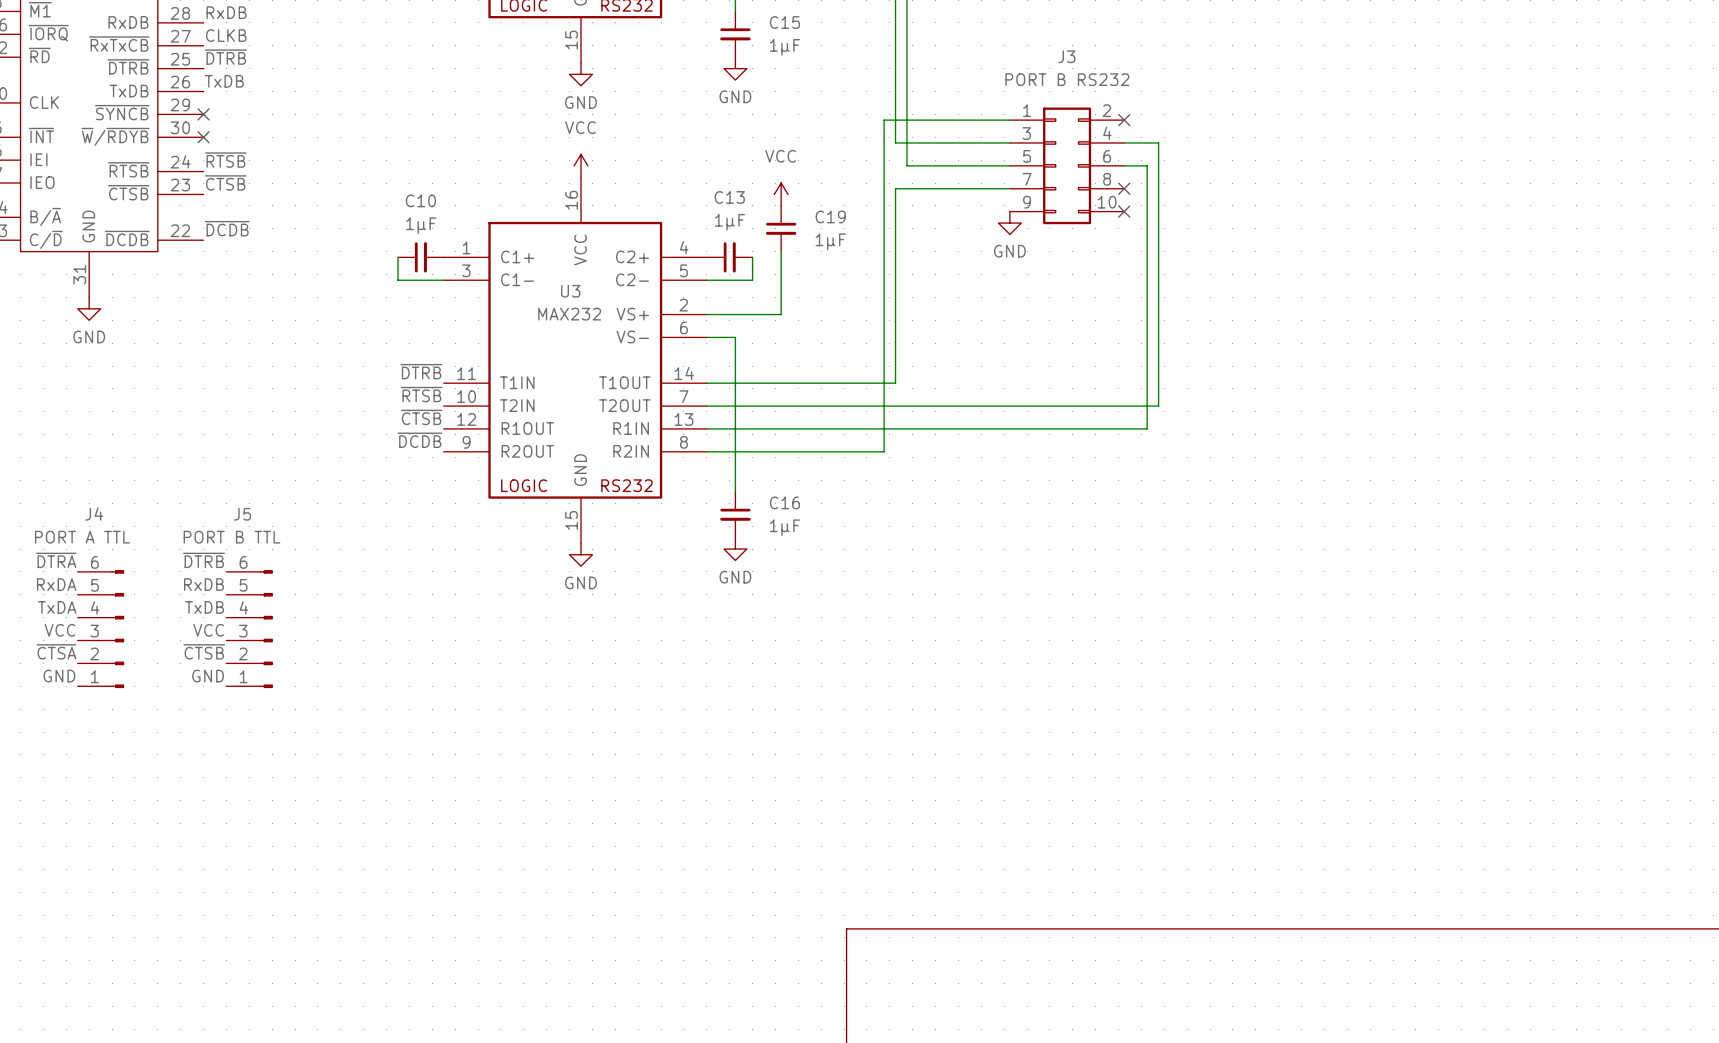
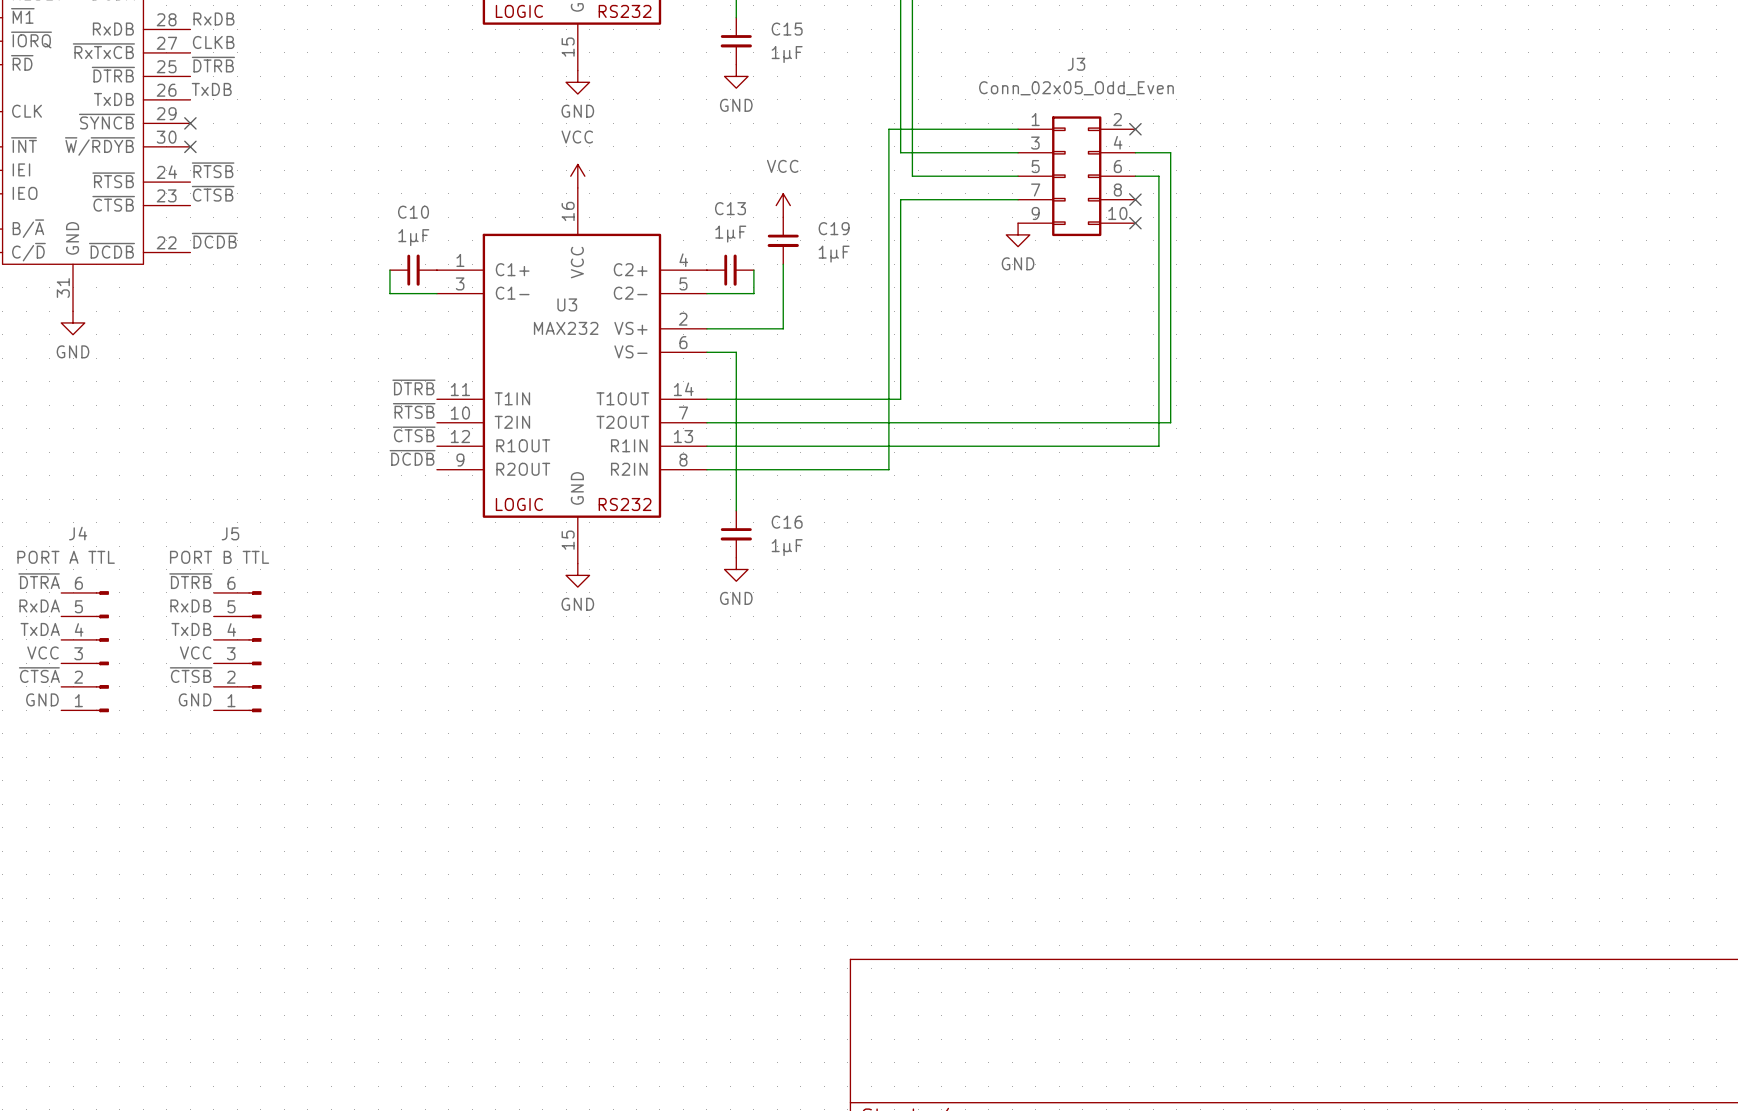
J3 value: PORT B RS232 (1067, 79) -> Conn_02x05_Odd_Even (1076, 88)

